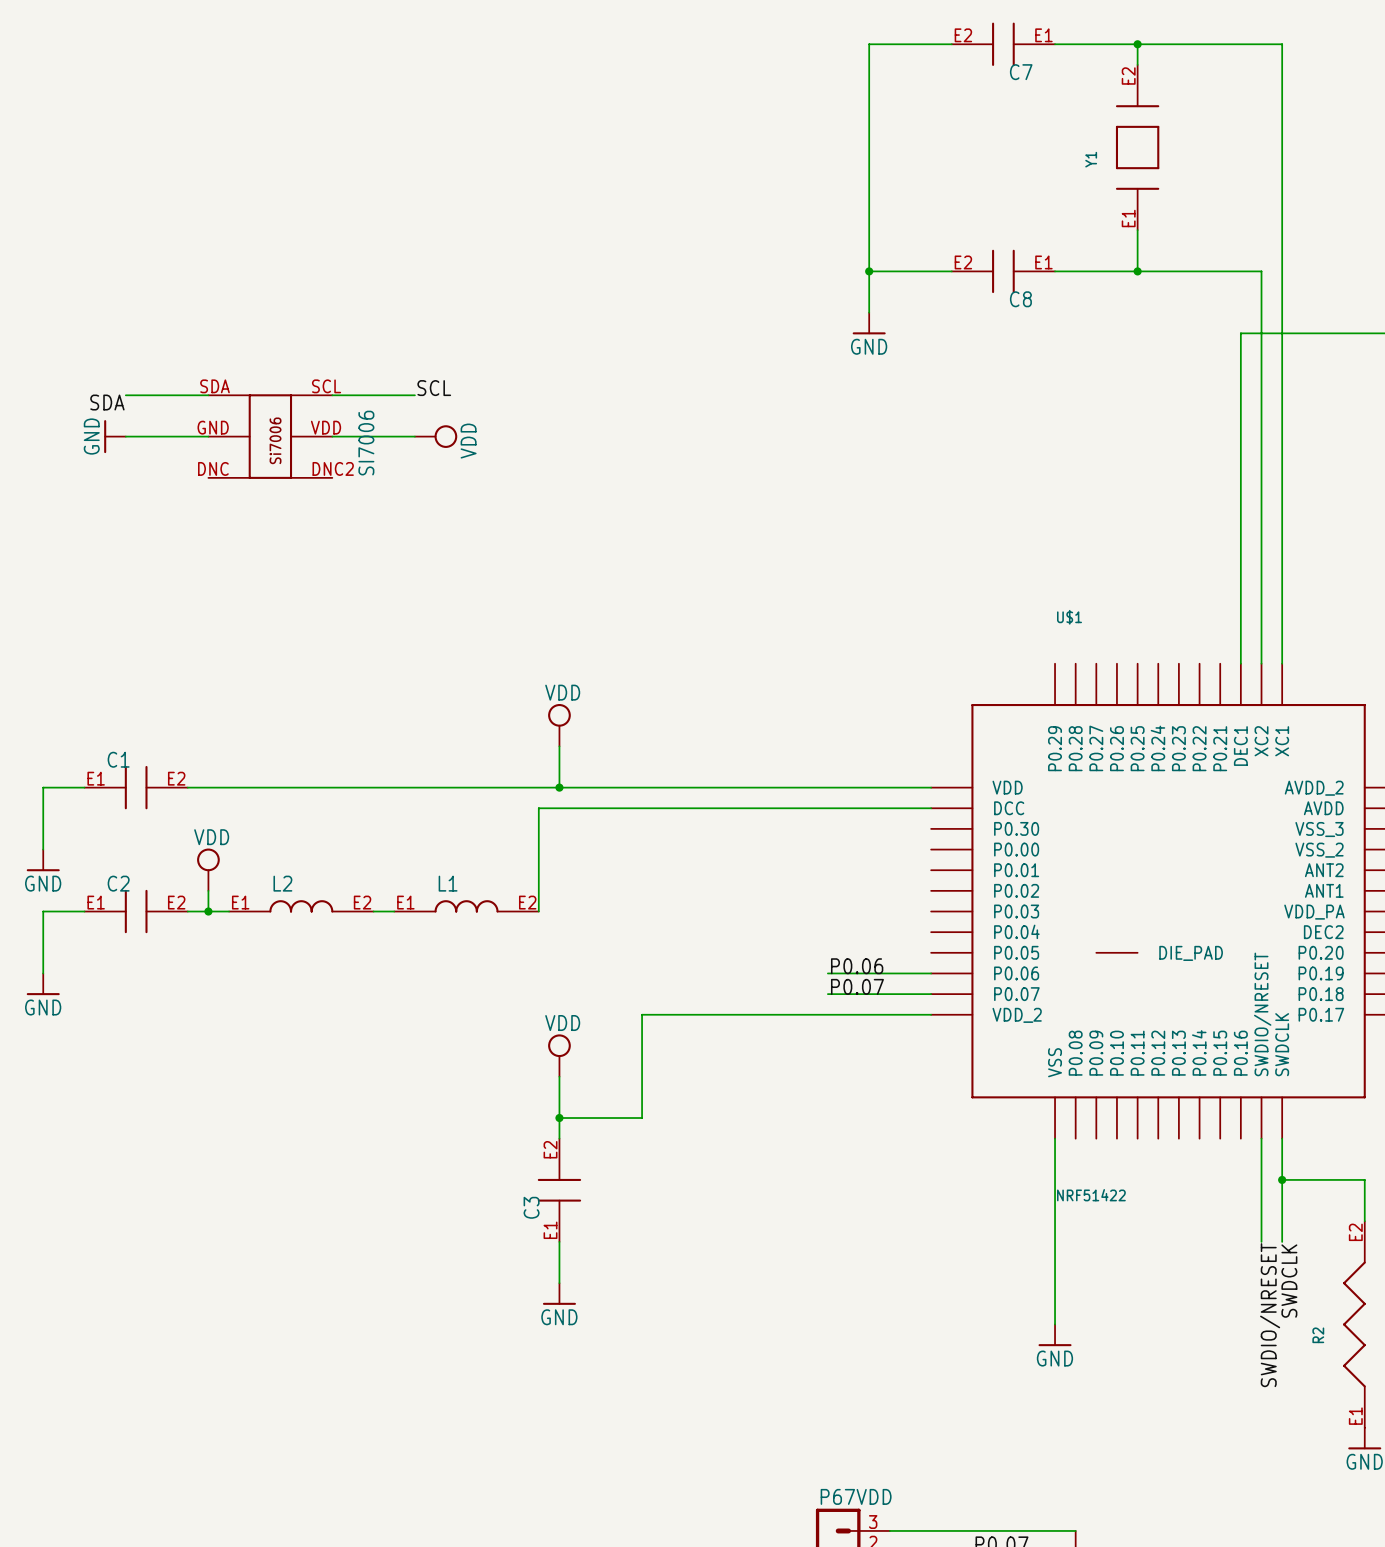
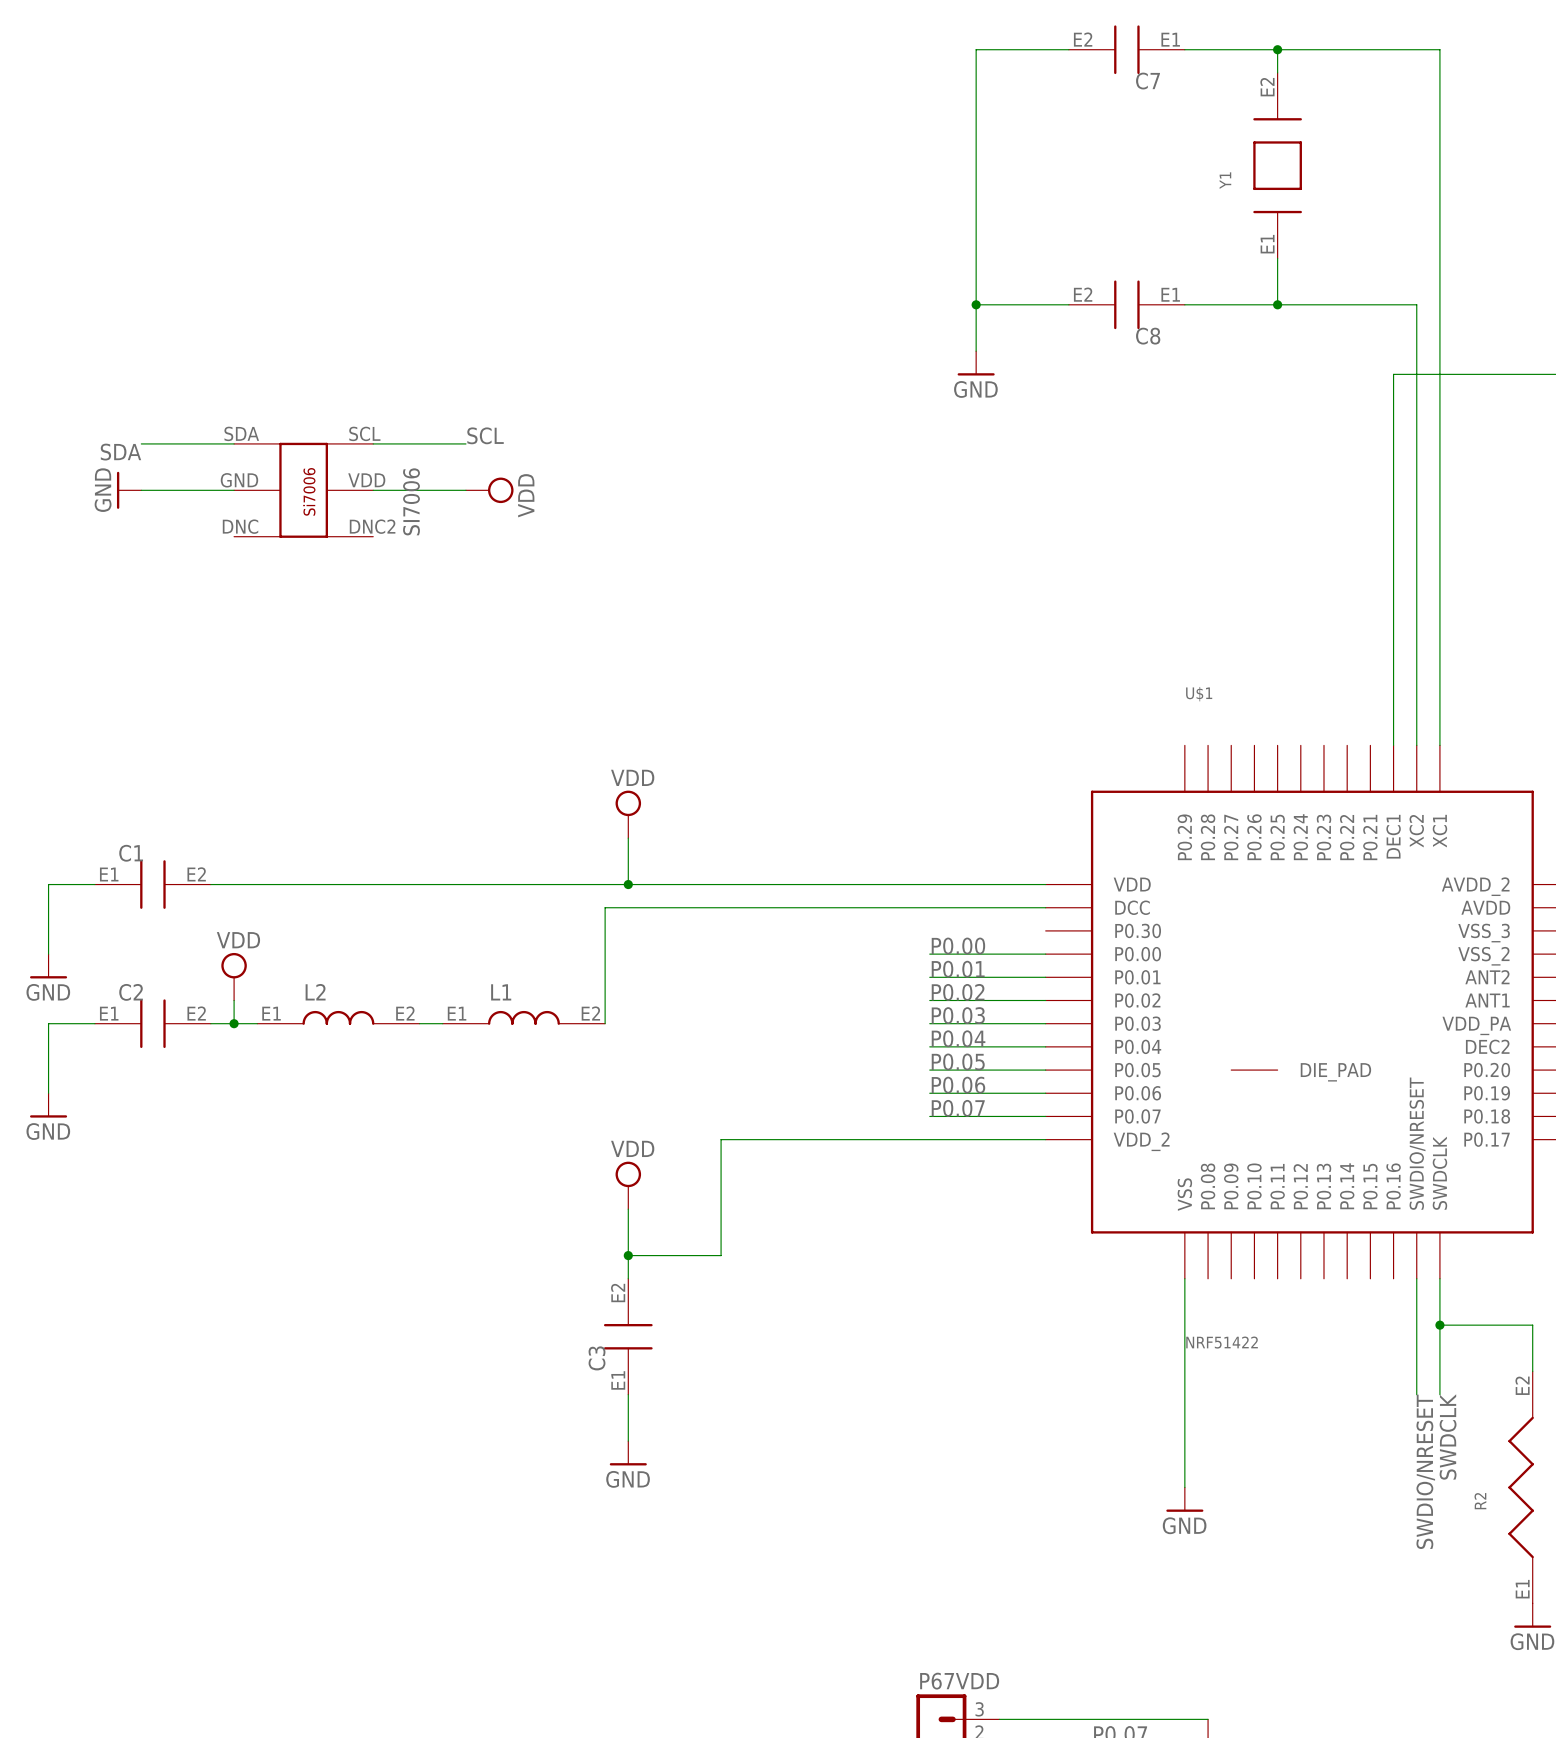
label: none -> P0.00 (958, 946)
wire: none -> (929, 954) (1045, 954)
label: none -> P0.01 (958, 969)
wire: none -> (929, 977) (1045, 977)
label: none -> P0.02 (958, 992)
wire: none -> (929, 1000) (1045, 1000)
label: none -> P0.03 (958, 1015)
wire: none -> (929, 1023) (1045, 1023)
label: none -> P0.04 (958, 1038)
wire: none -> (929, 1046) (1045, 1046)
label: none -> P0.05 (958, 1061)
wire: none -> (929, 1070) (1045, 1070)

